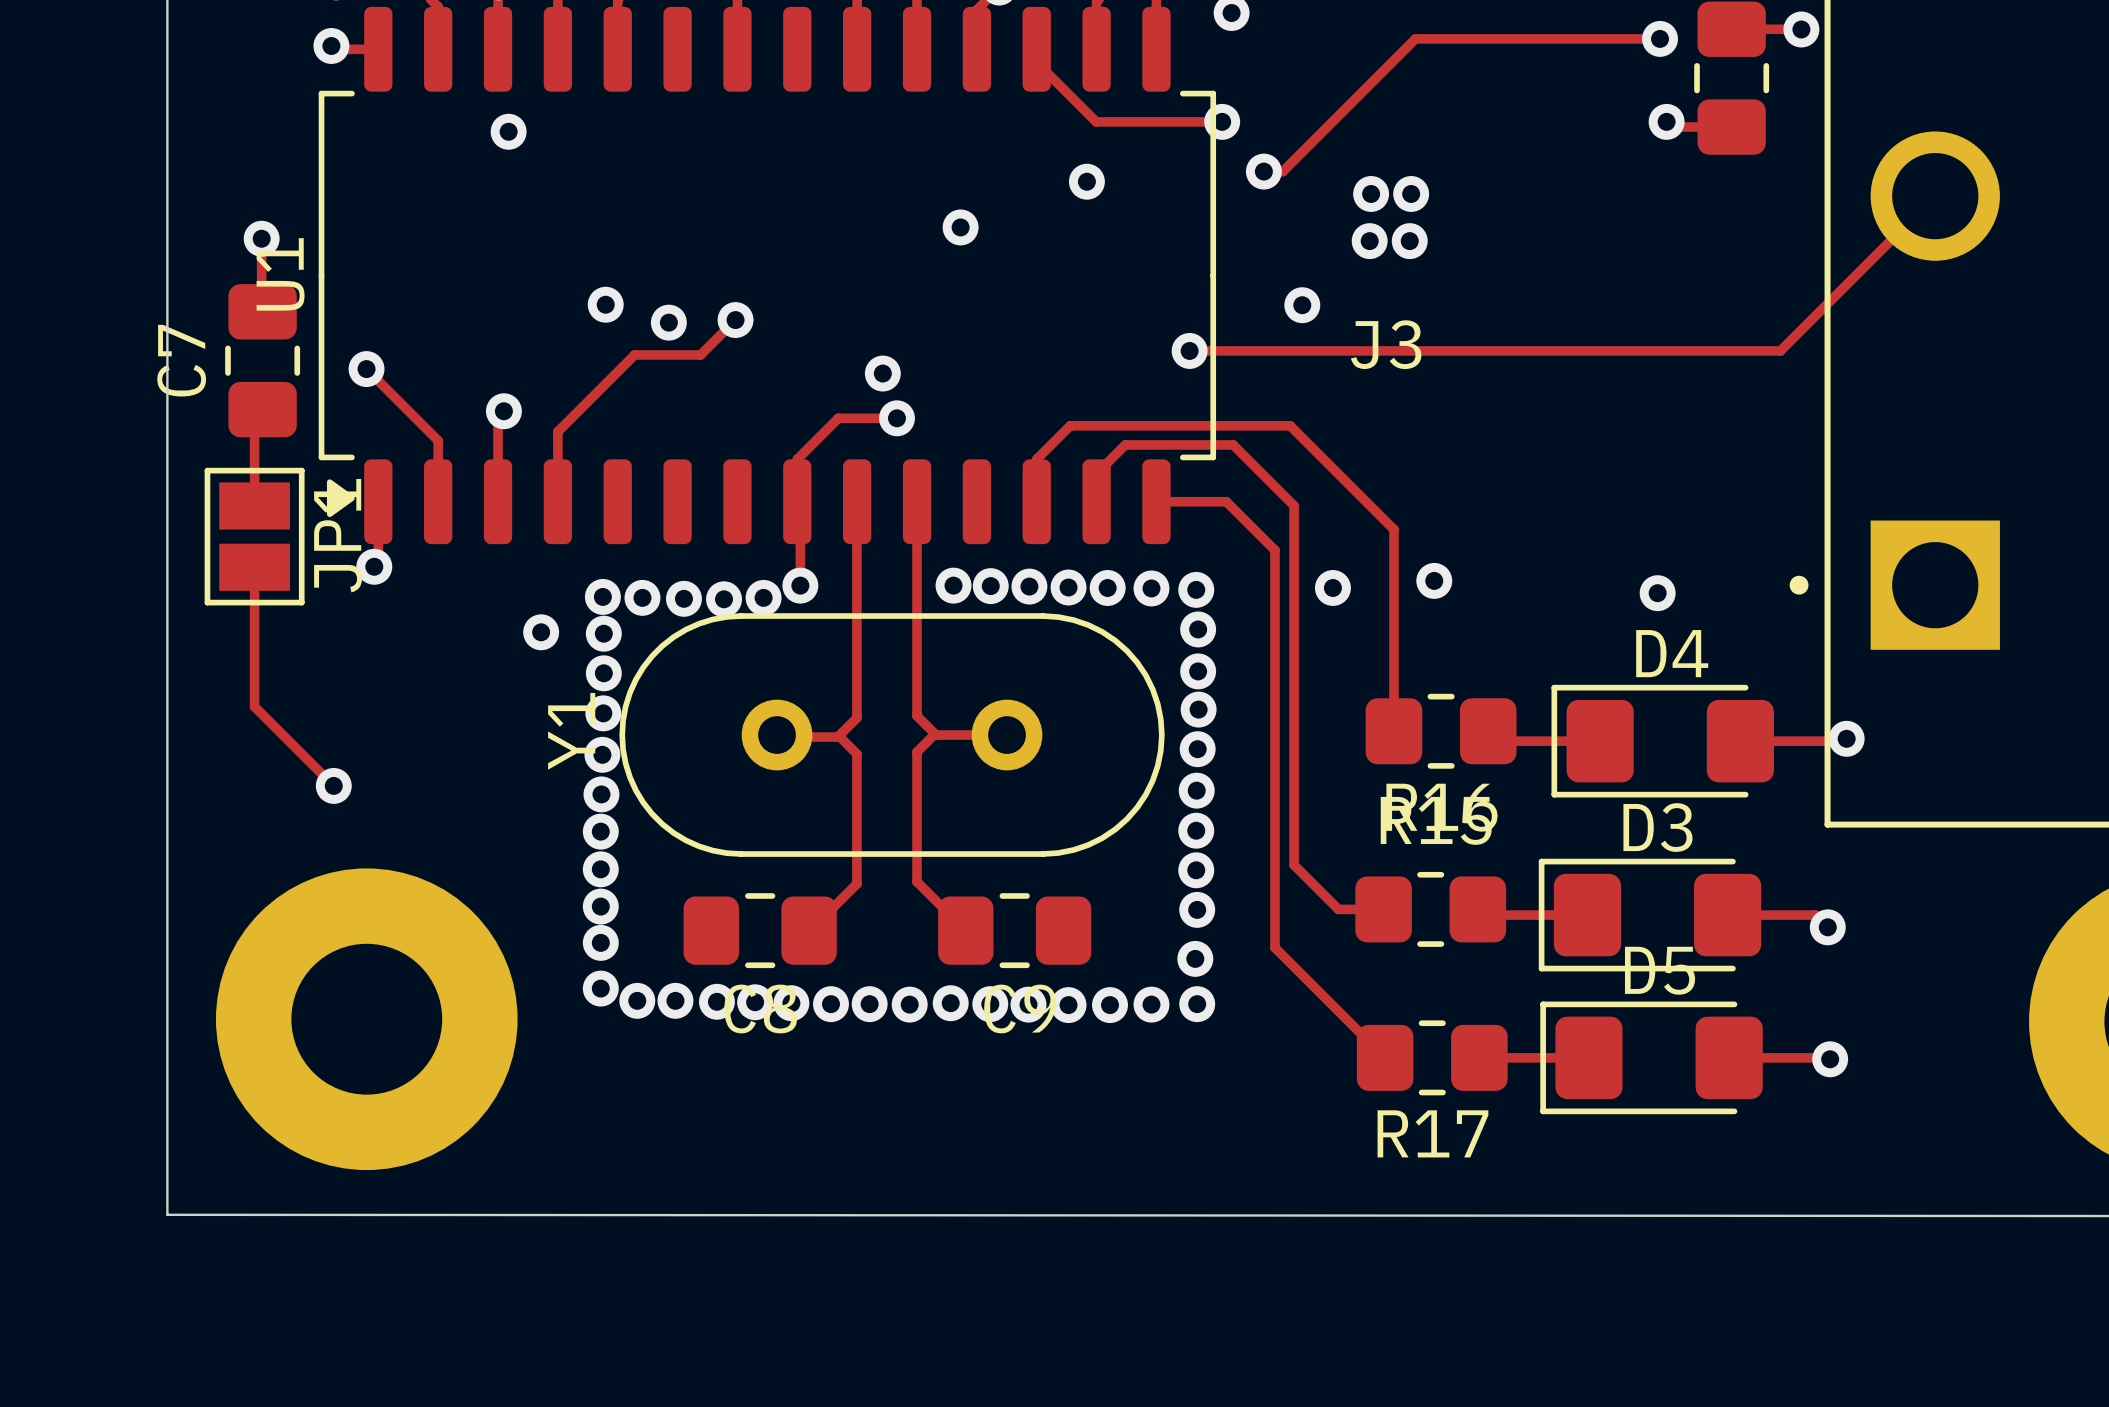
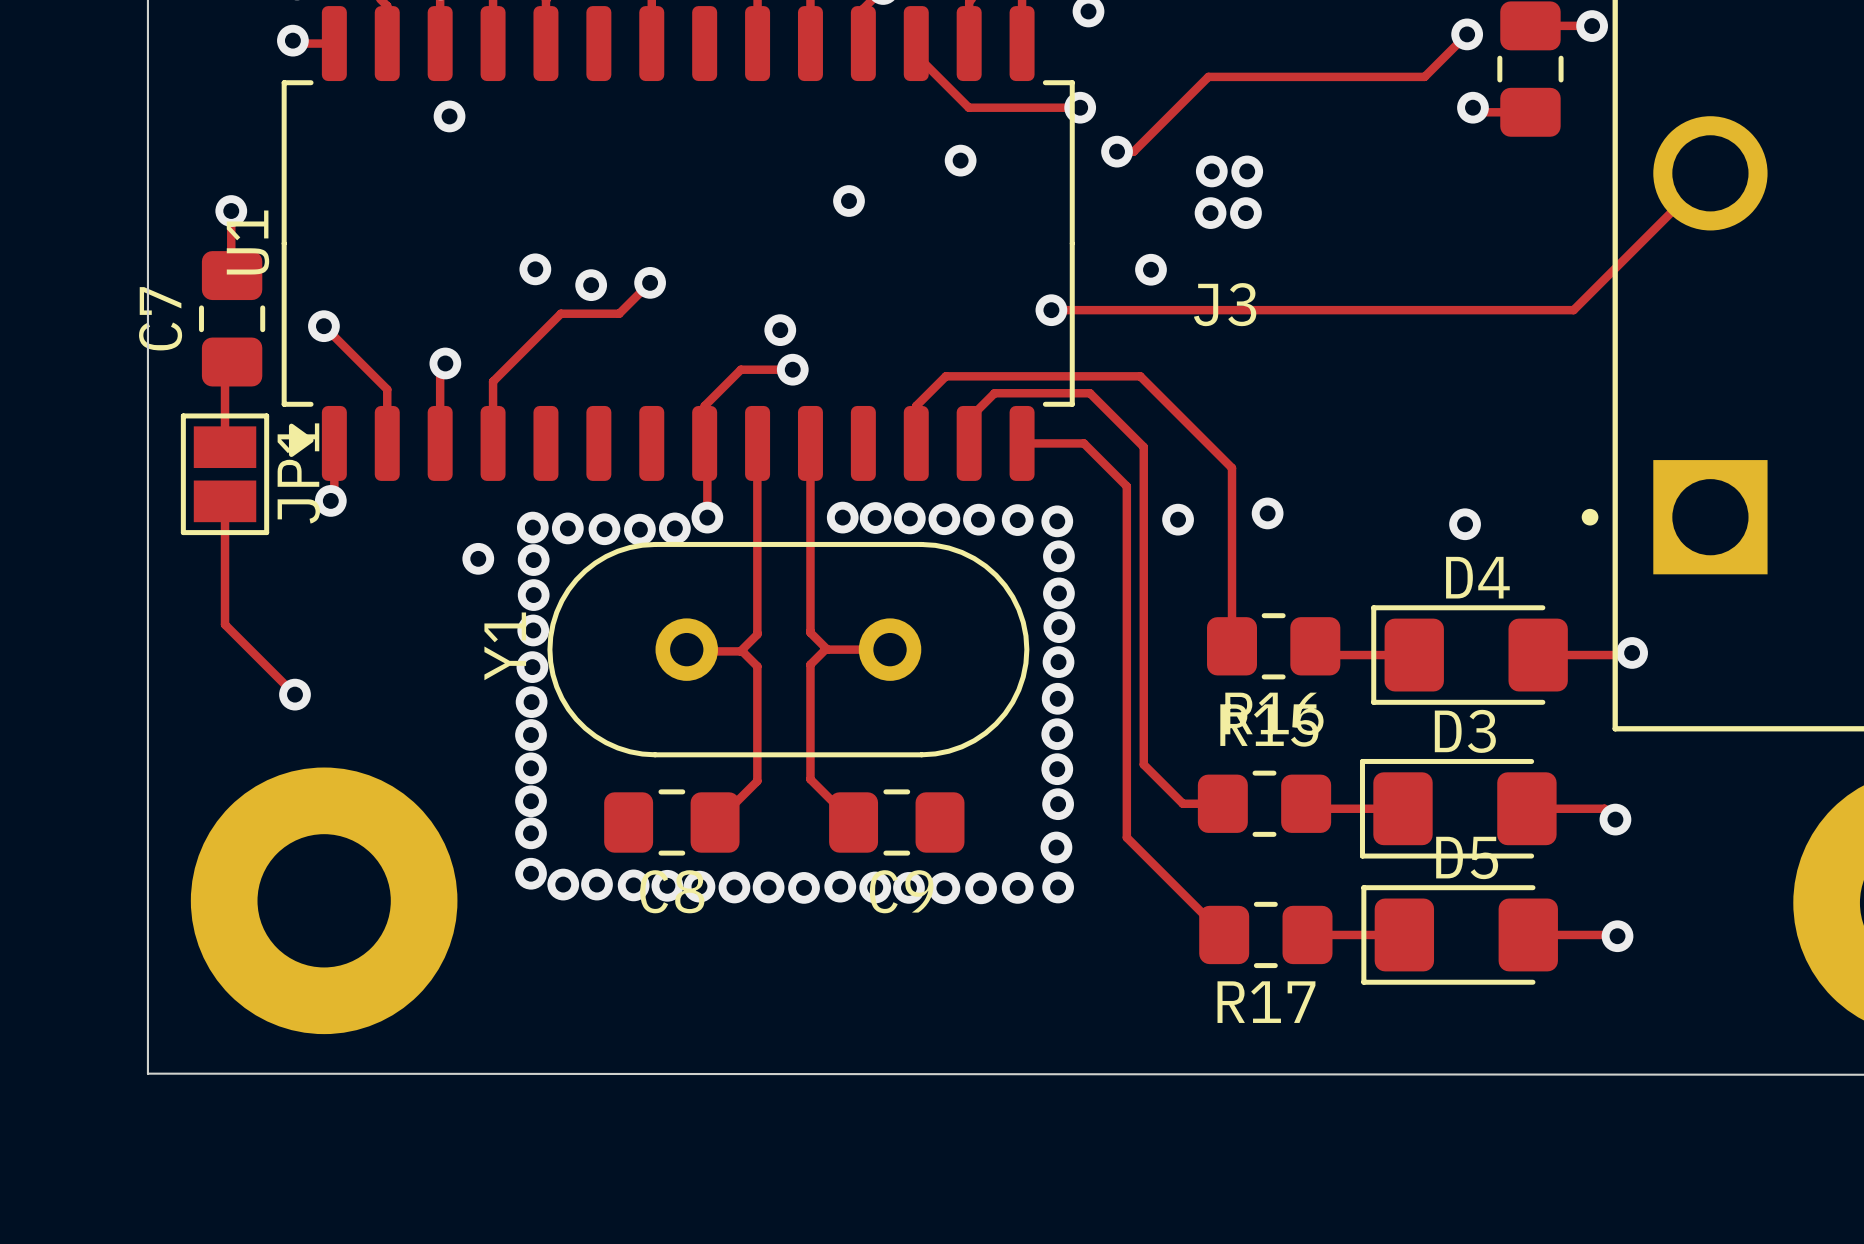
track: (1660, 38) (1415, 38) (1367, 86) -> (1467, 34) (1424, 76) (1208, 76)

